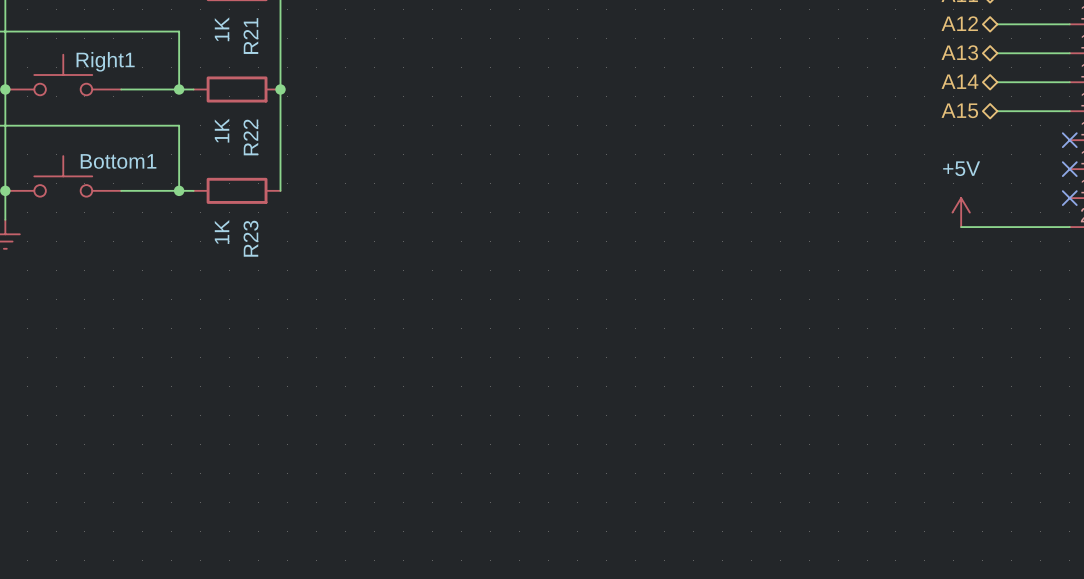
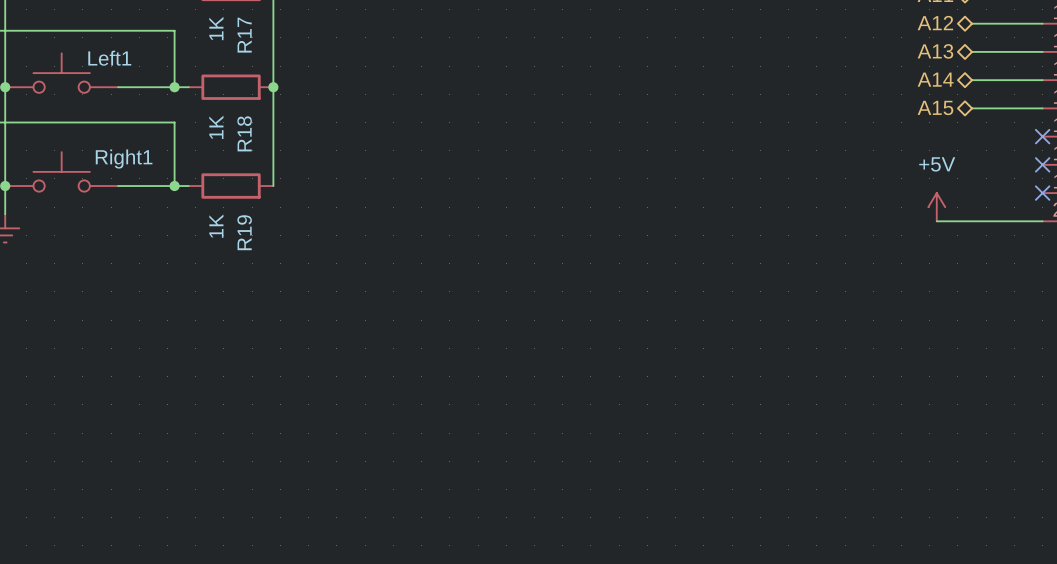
R21 name: R21 (250, 36) -> R17 (244, 35)
Right1 name: Right1 (105, 61) -> Left1 (109, 58)
R22 name: R22 (250, 137) -> R18 (244, 133)
Bottom1 name: Bottom1 (118, 161) -> Right1 (124, 159)
R23 name: R23 (250, 238) -> R19 (244, 232)

